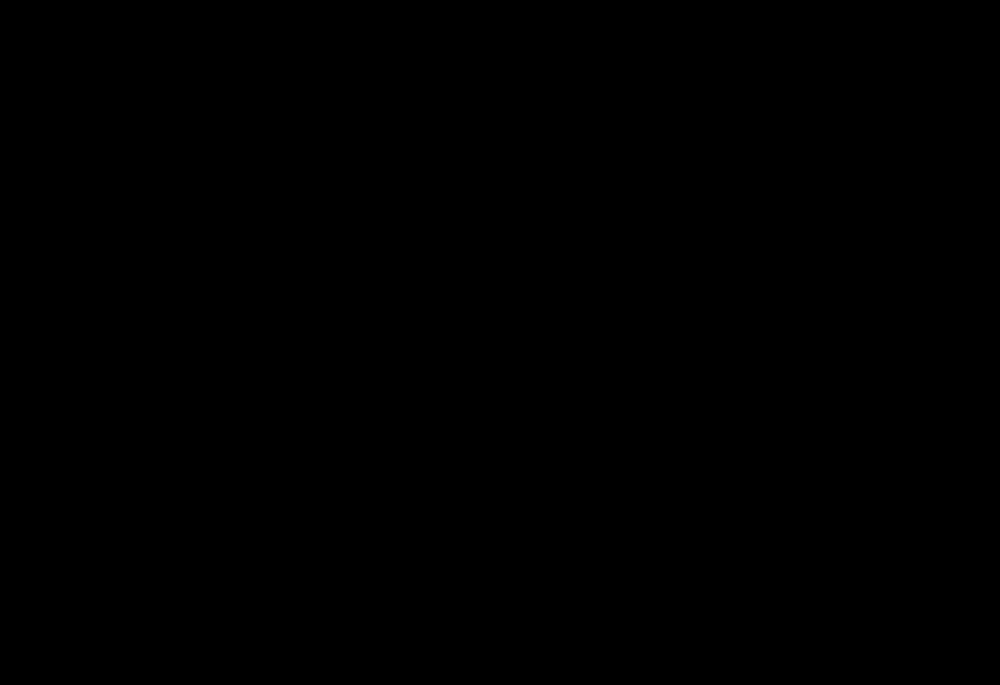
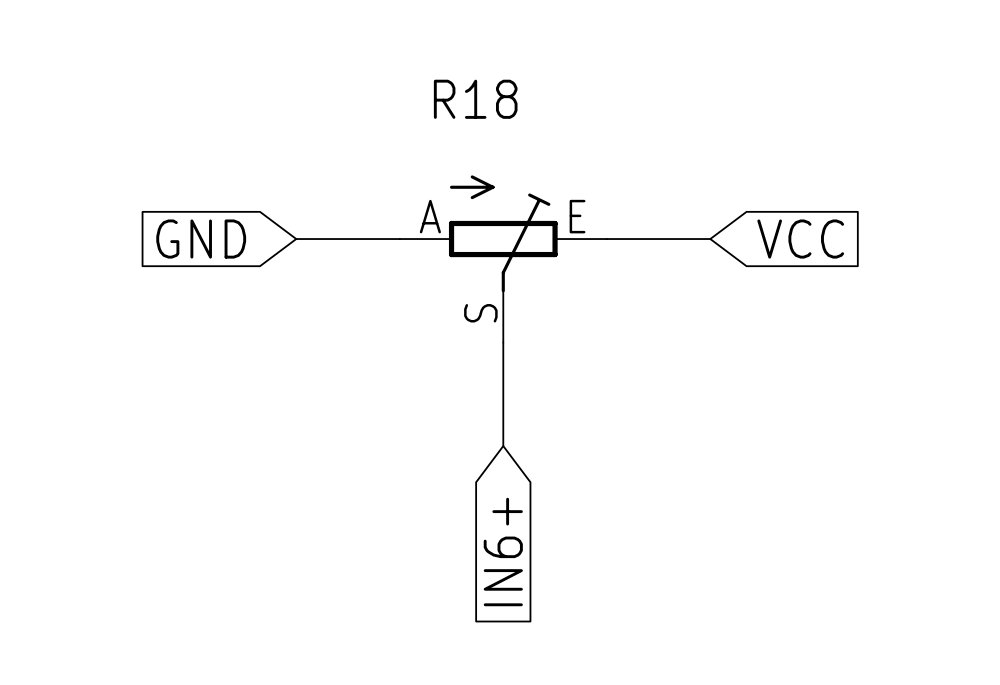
global label: none -> GND (201, 239)
wire: none -> (296, 239) (399, 239)
wire: none -> (606, 239) (710, 239)
global label: none -> VCC (800, 239)
R18: none -> (503, 258)
wire: none -> (503, 342) (503, 446)
global label: none -> IN6+ (503, 551)

